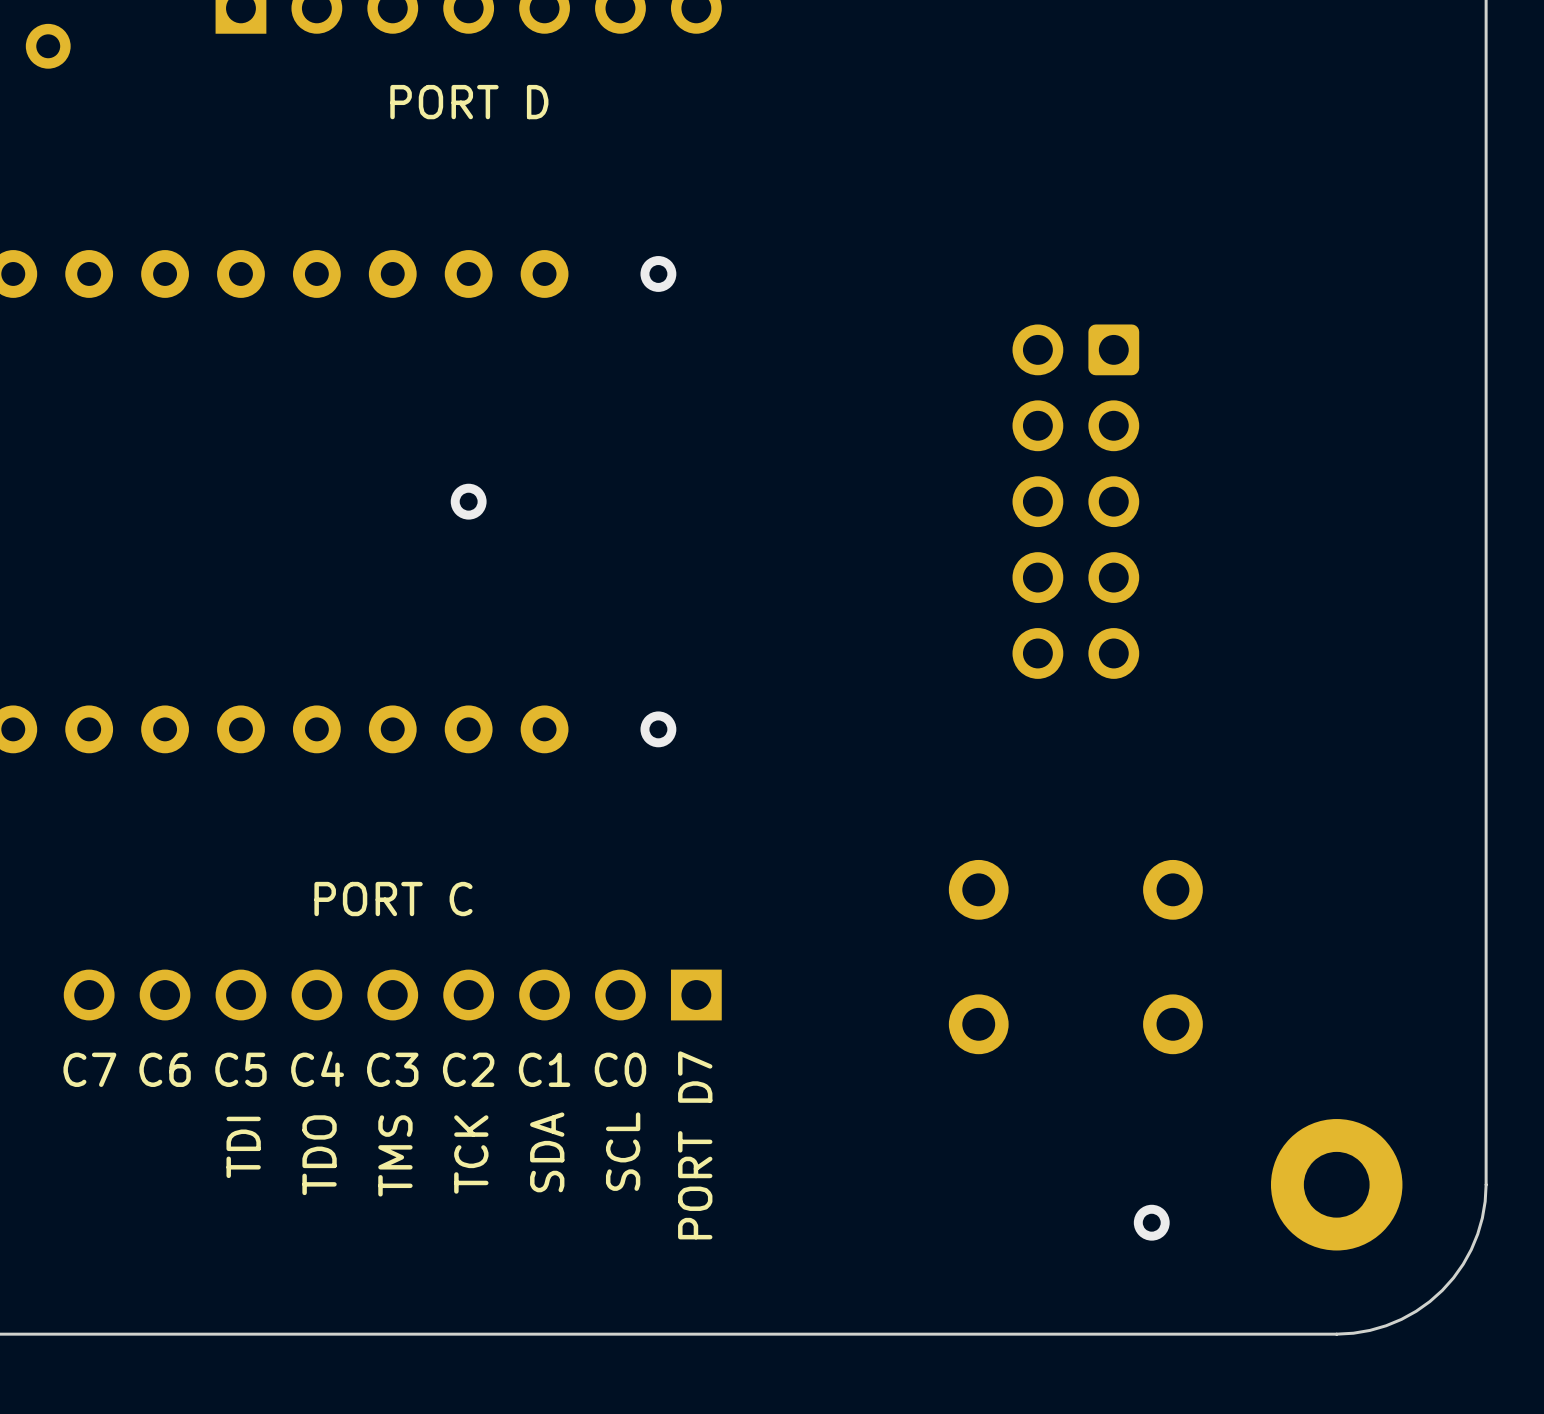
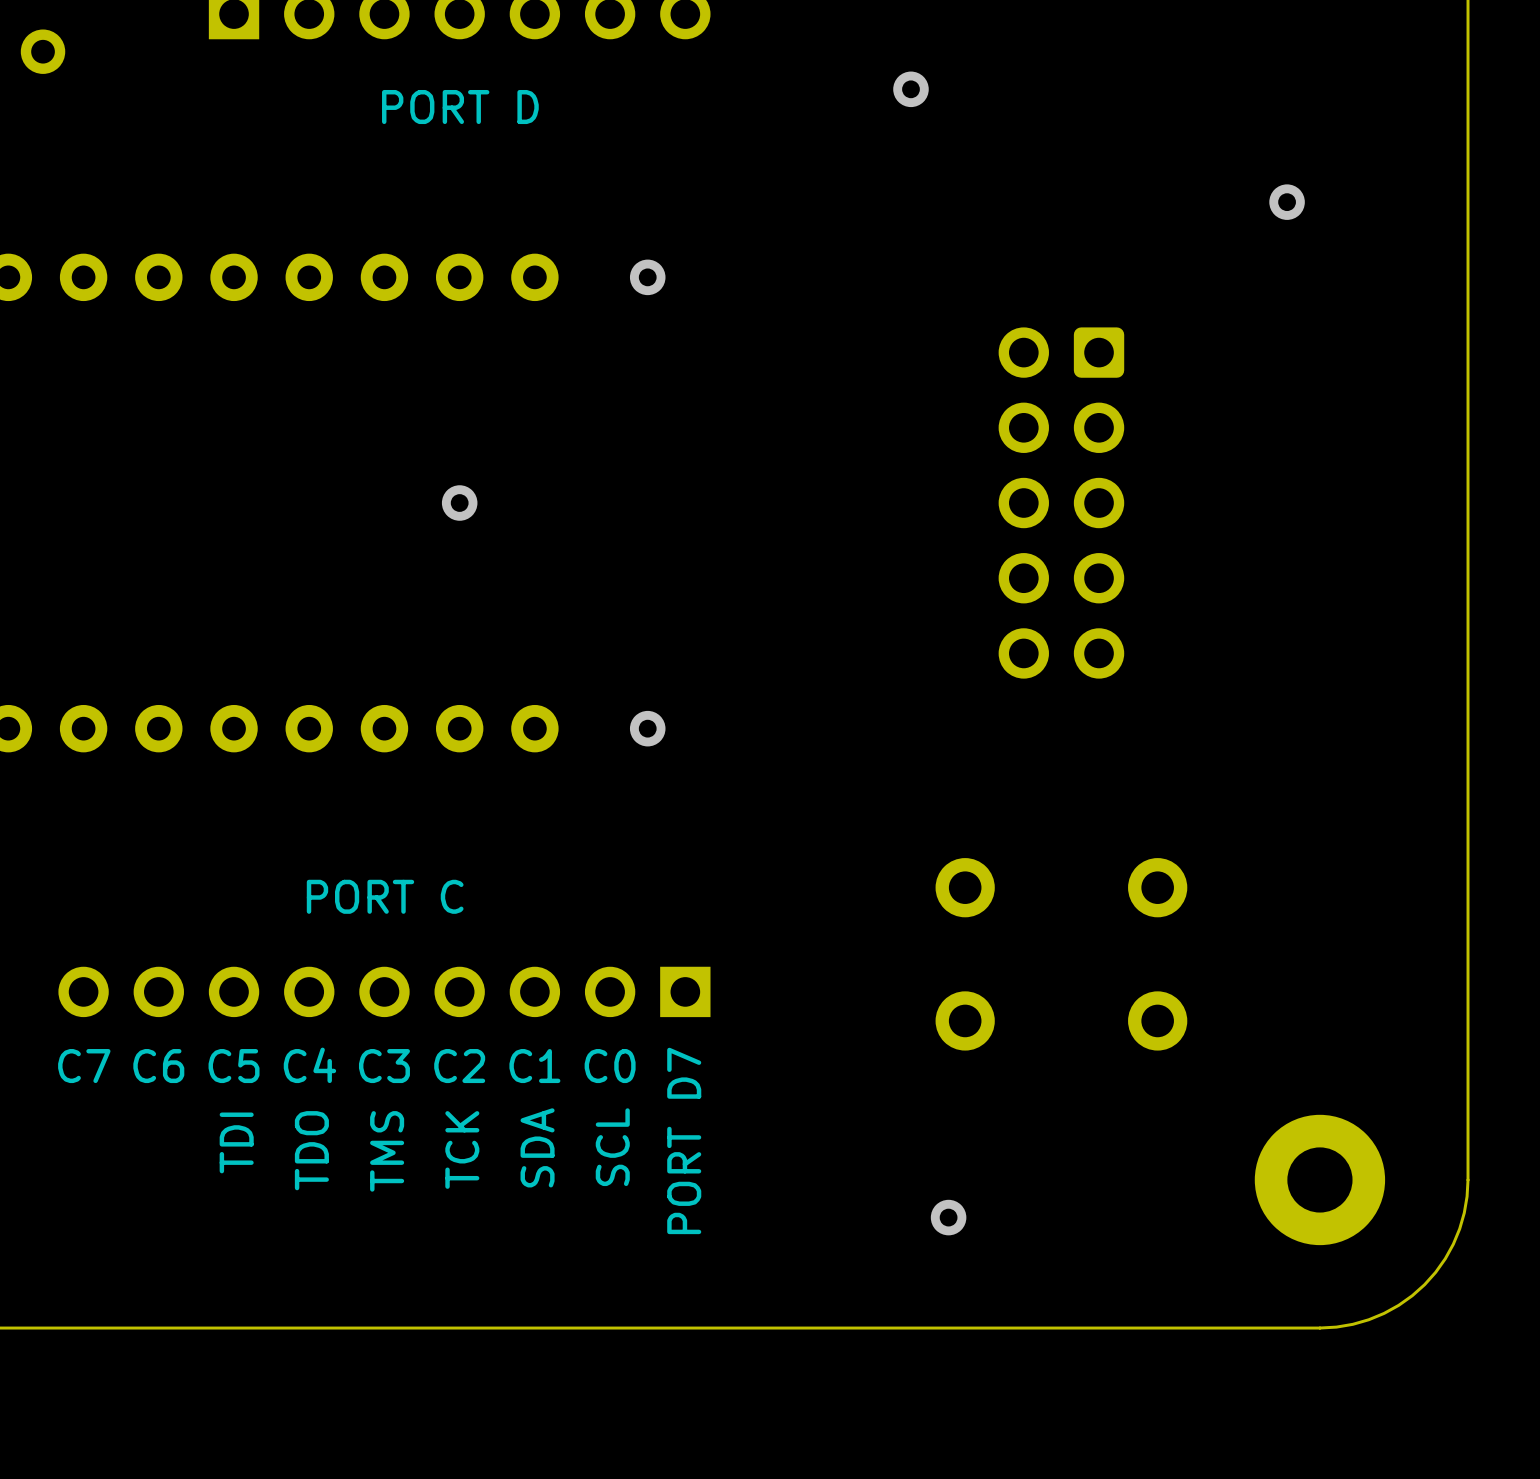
via: none -> (910, 89)
via: none -> (1287, 202)
via: none -> (948, 1217)
via: (1151, 1222) -> none

